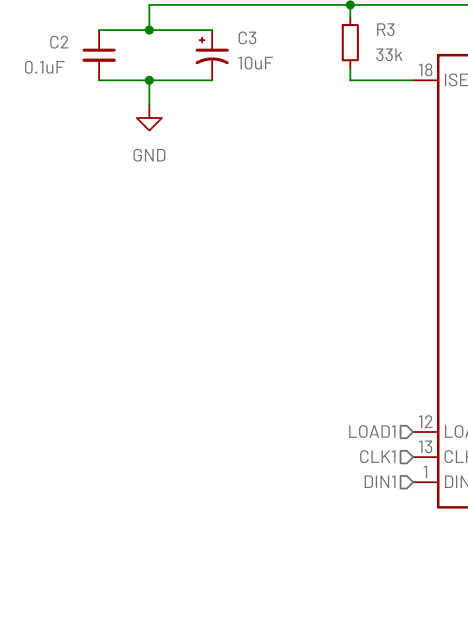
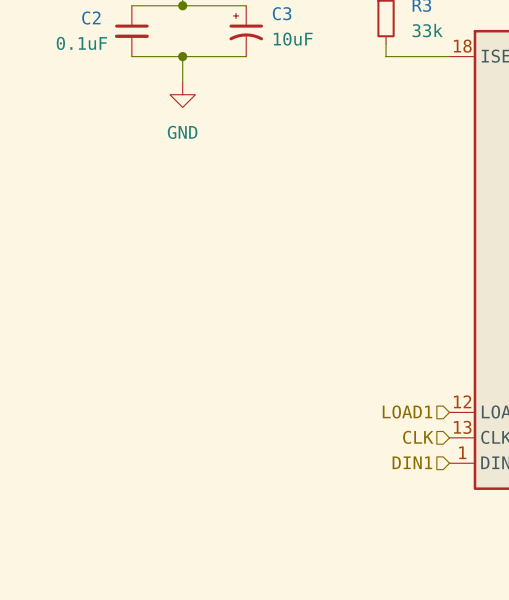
hierarchical label: CLK1 (377, 456) -> CLK (418, 437)

